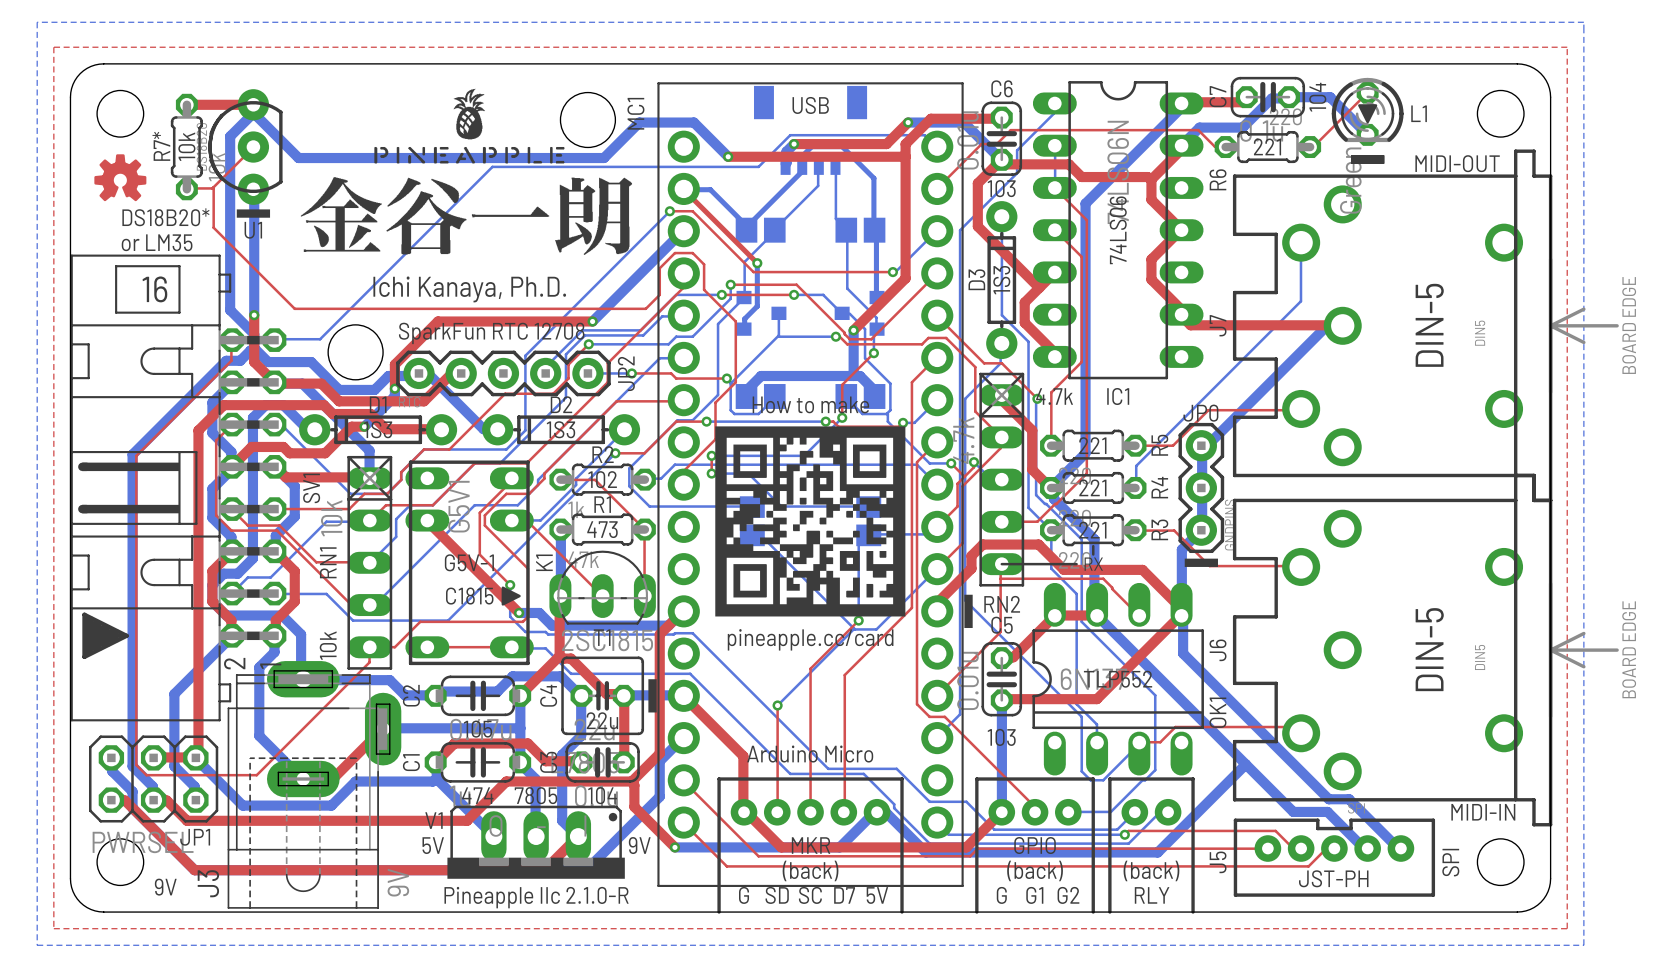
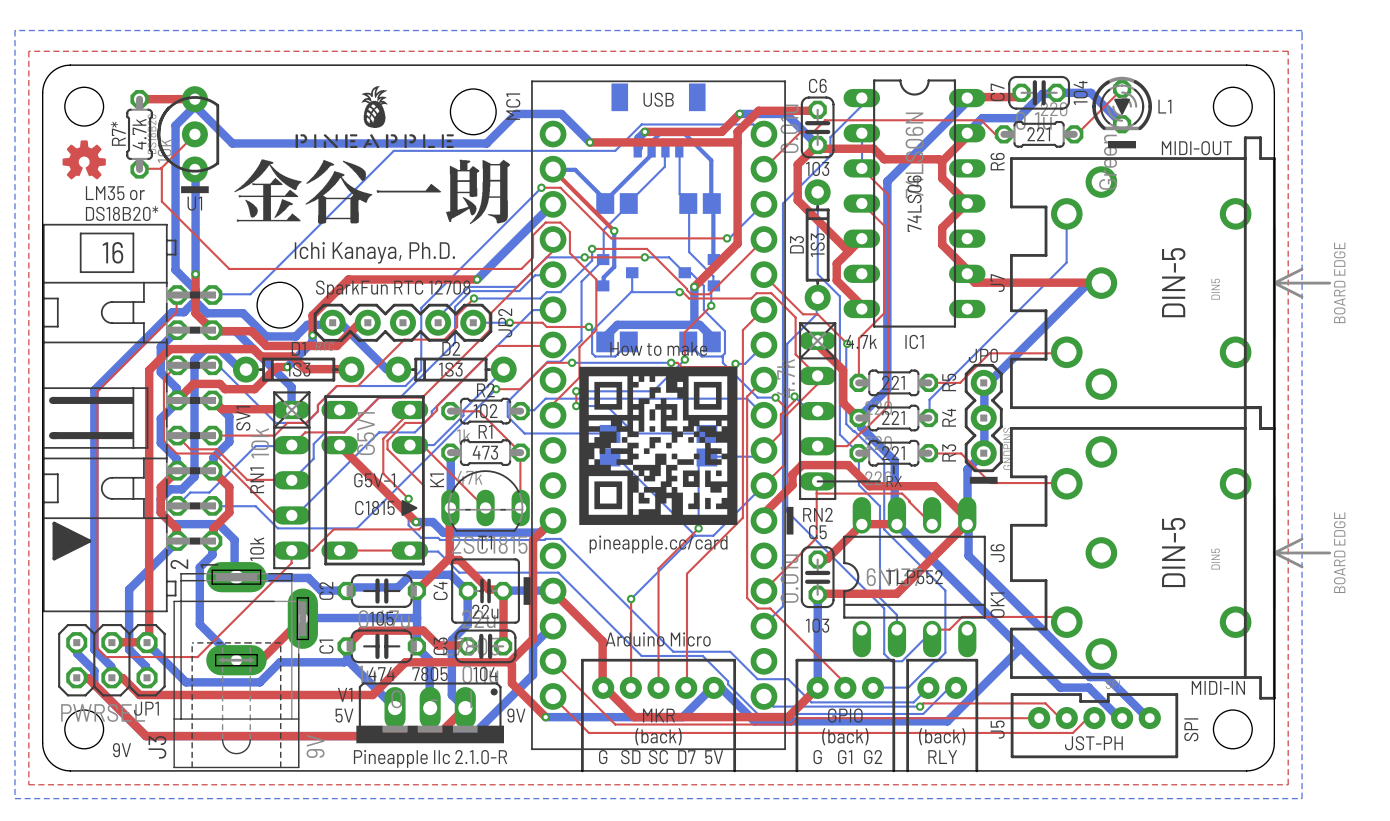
text: 10k (186, 146) -> 4.7k (139, 134)
text: DS18B20* (165, 217) -> LM35 or (115, 193)
text: or LM35 (157, 242) -> DS18B20* (122, 213)

